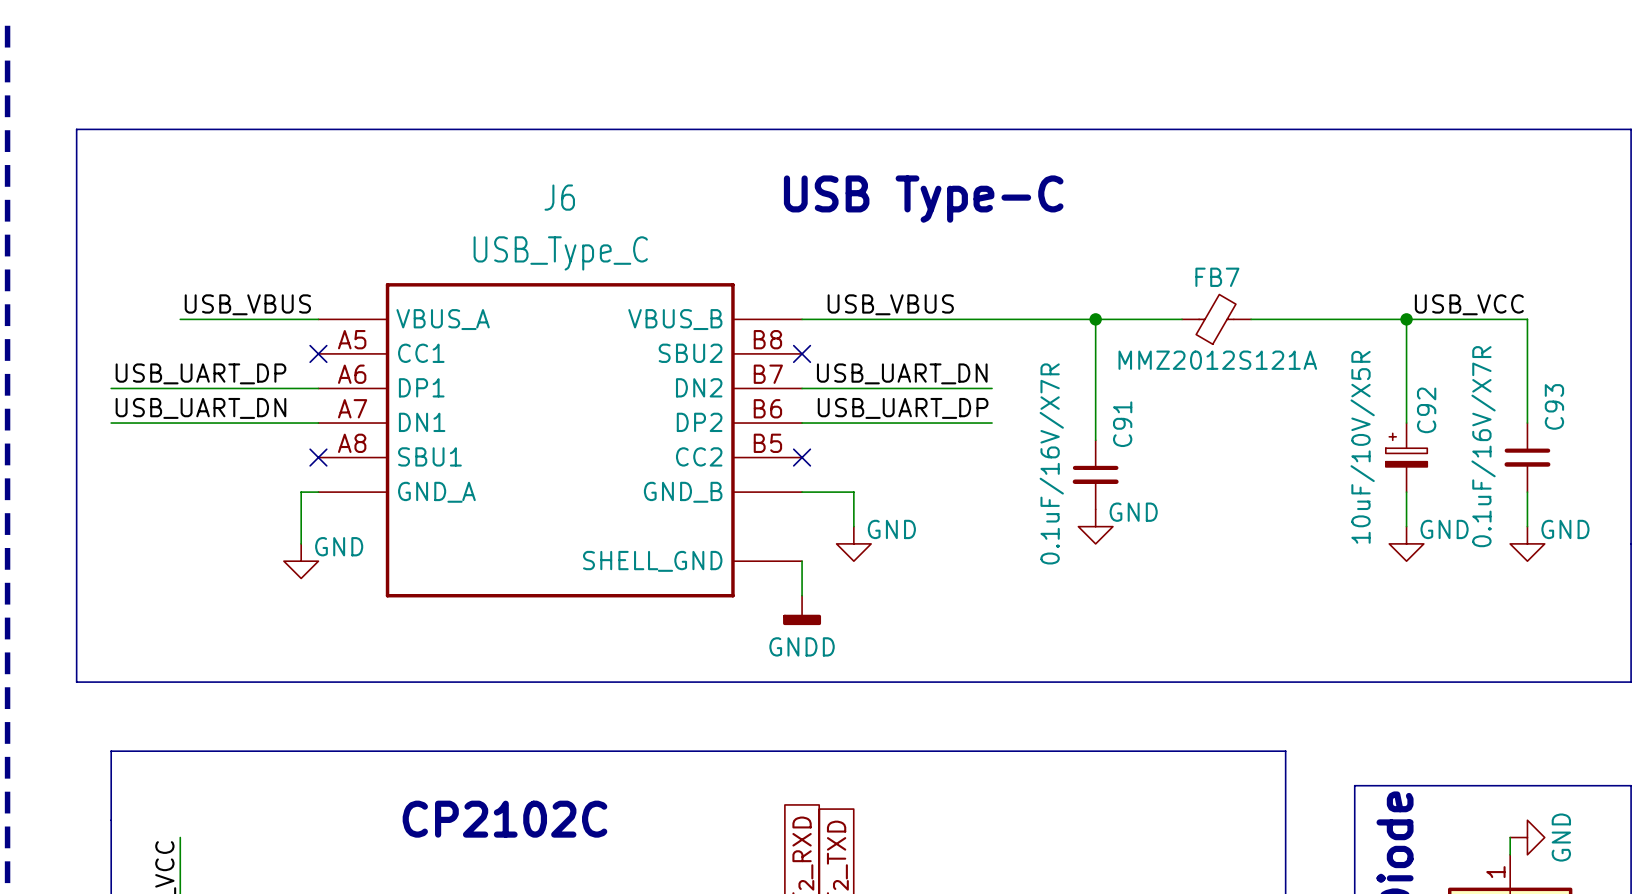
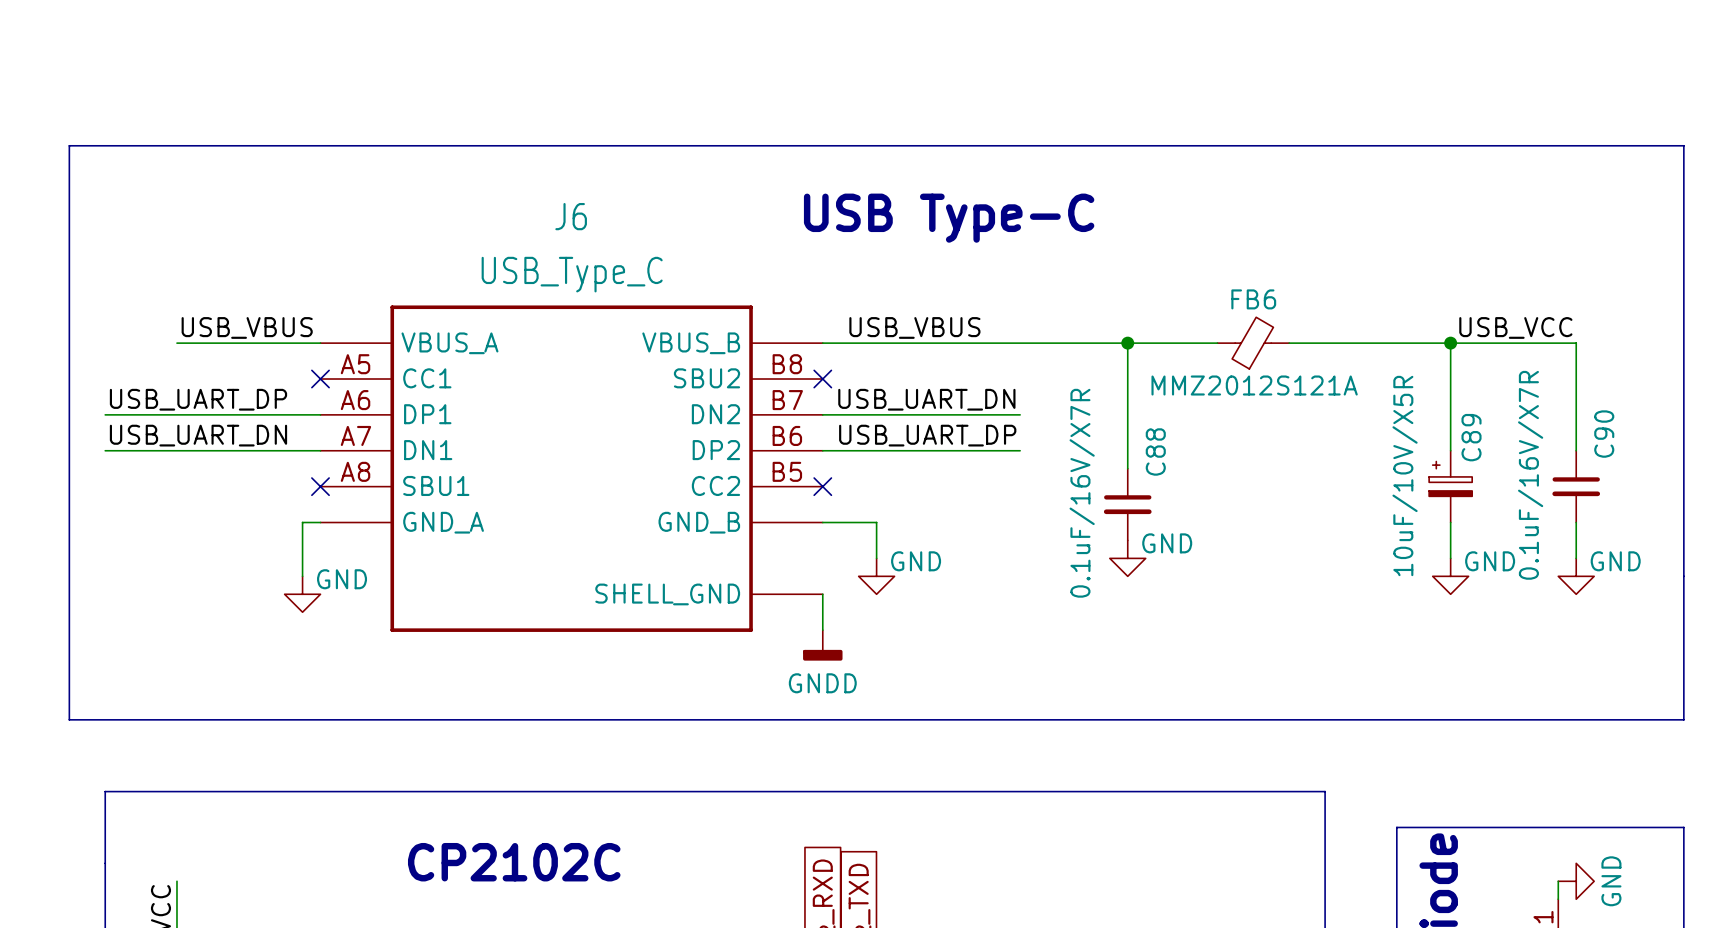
FB7 name: FB7 (1217, 277) -> FB6 (1253, 299)
C93 name: C93 (1554, 406) -> C90 (1604, 434)
C92 name: C92 (1426, 410) -> C89 (1471, 437)
C91 name: C91 (1122, 424) -> C88 (1155, 451)

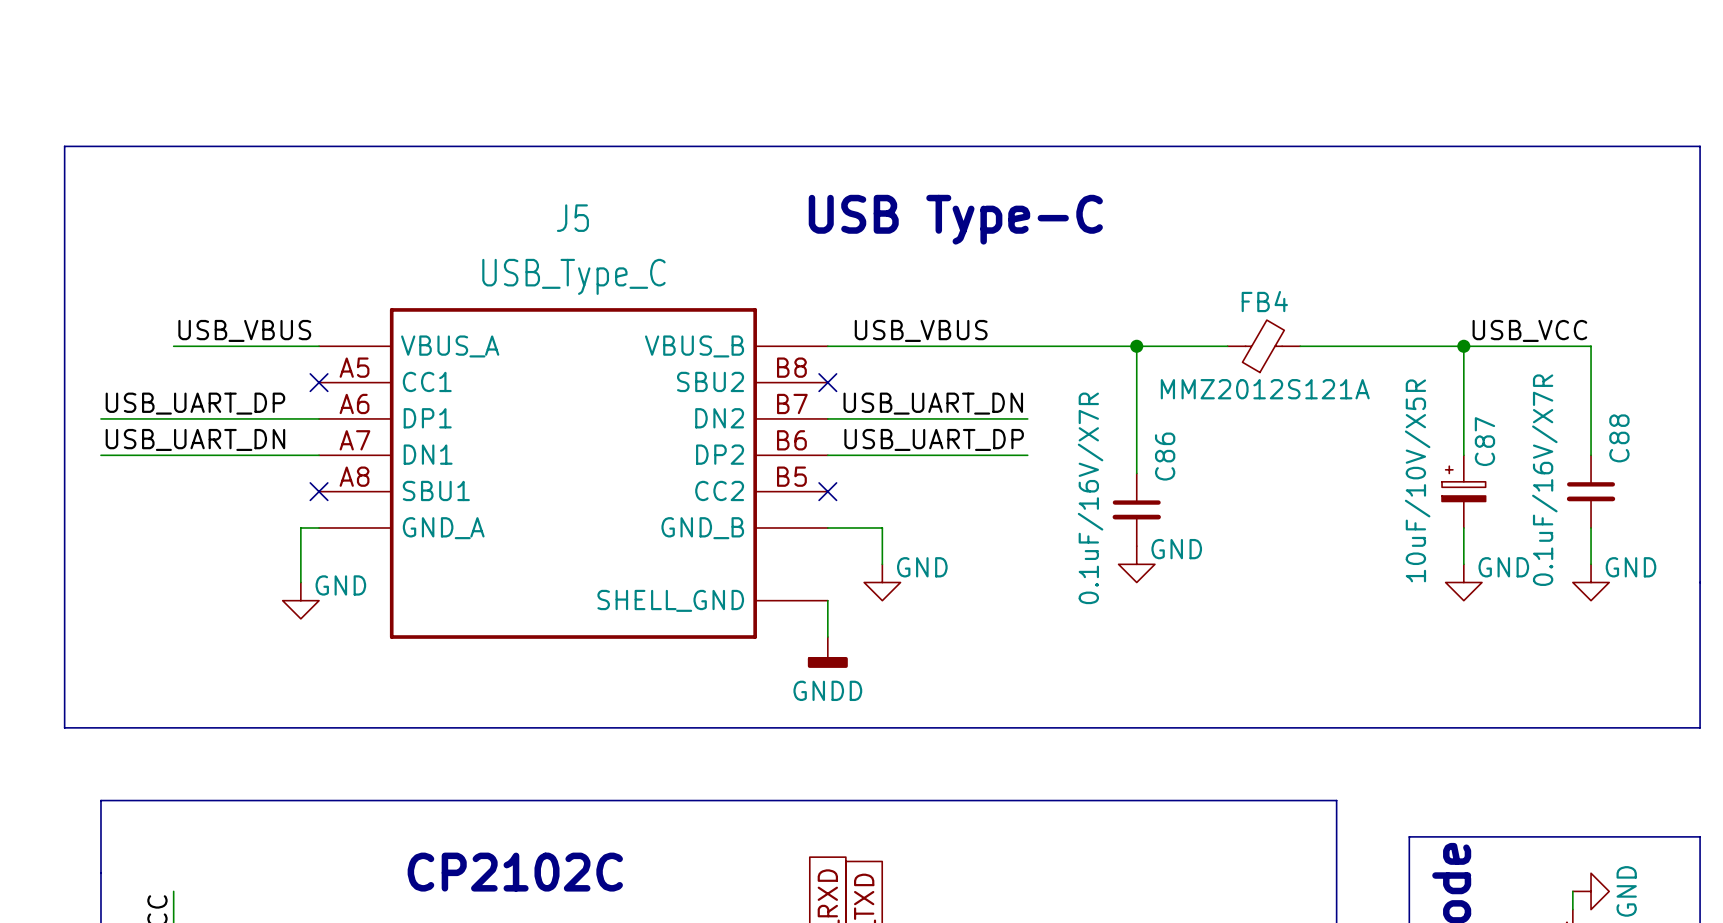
J6 name: J6 (571, 216) -> J5 (572, 218)
FB6 name: FB6 (1253, 299) -> FB4 (1264, 301)
C90 name: C90 (1604, 434) -> C88 (1619, 438)
C89 name: C89 (1471, 437) -> C87 (1484, 441)
C88 name: C88 (1155, 451) -> C86 (1165, 456)

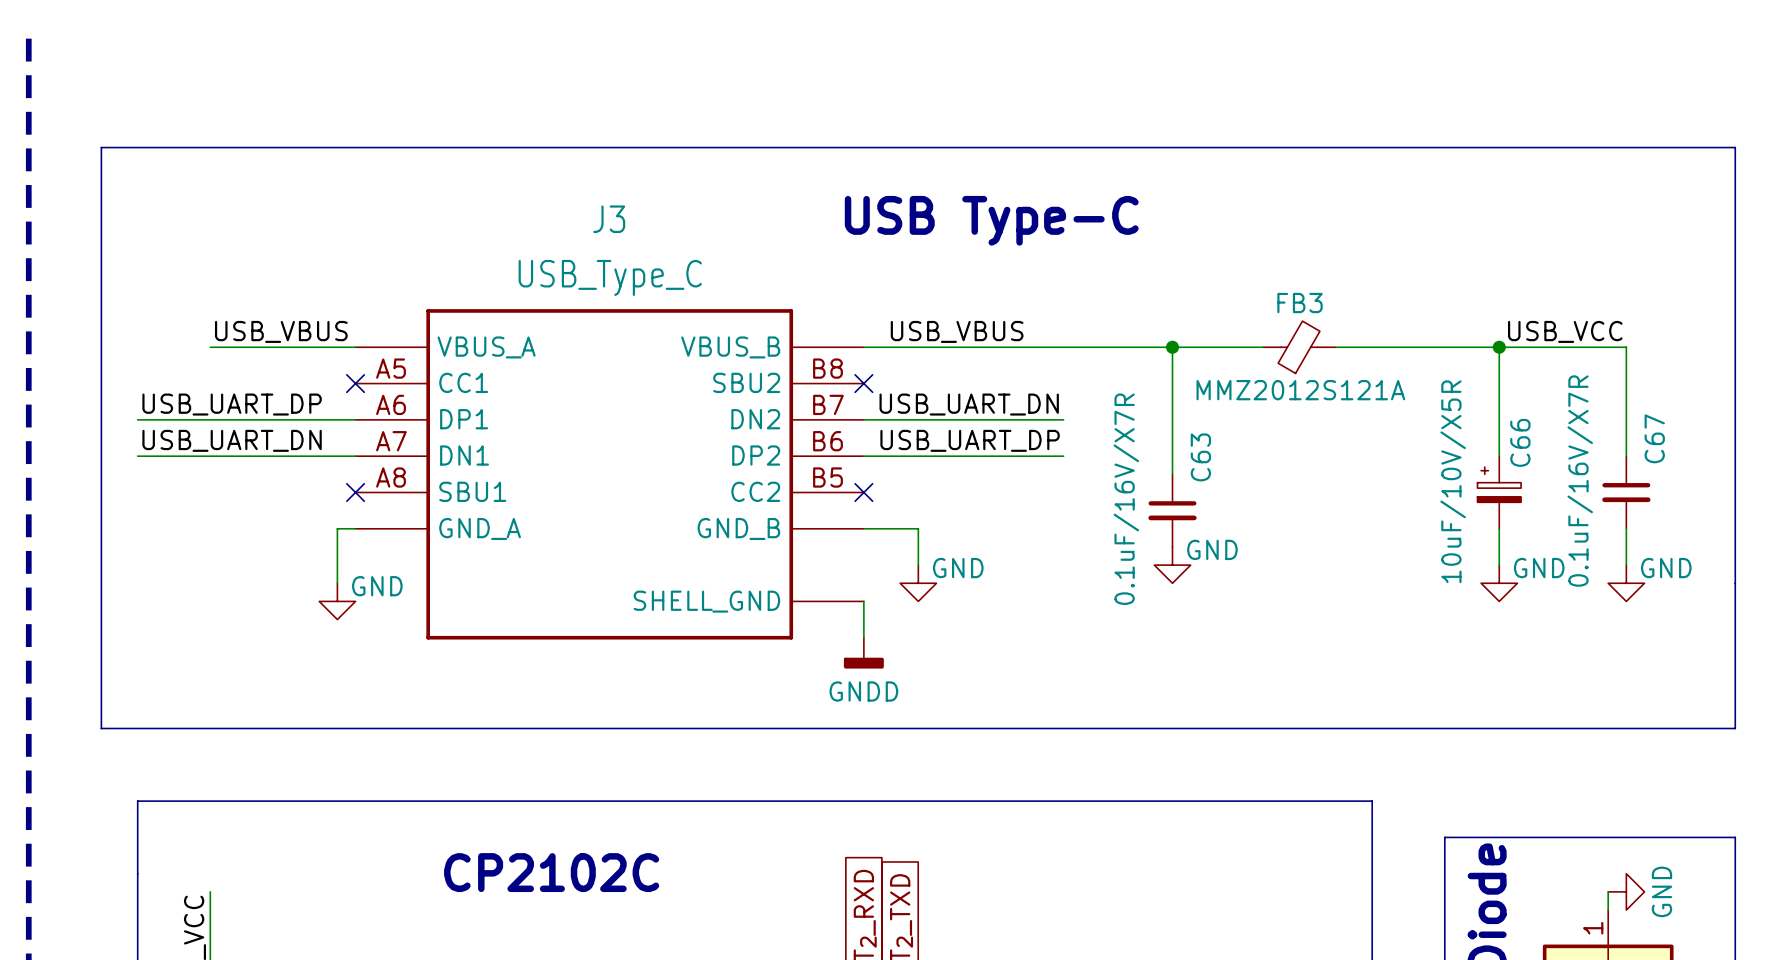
J5 name: J5 (572, 218) -> J3 (609, 219)
FB4 name: FB4 (1264, 301) -> FB3 (1300, 303)
C88 name: C88 (1619, 438) -> C67 (1654, 438)
C87 name: C87 (1484, 441) -> C66 (1520, 442)
C86 name: C86 (1165, 456) -> C63 (1200, 457)

